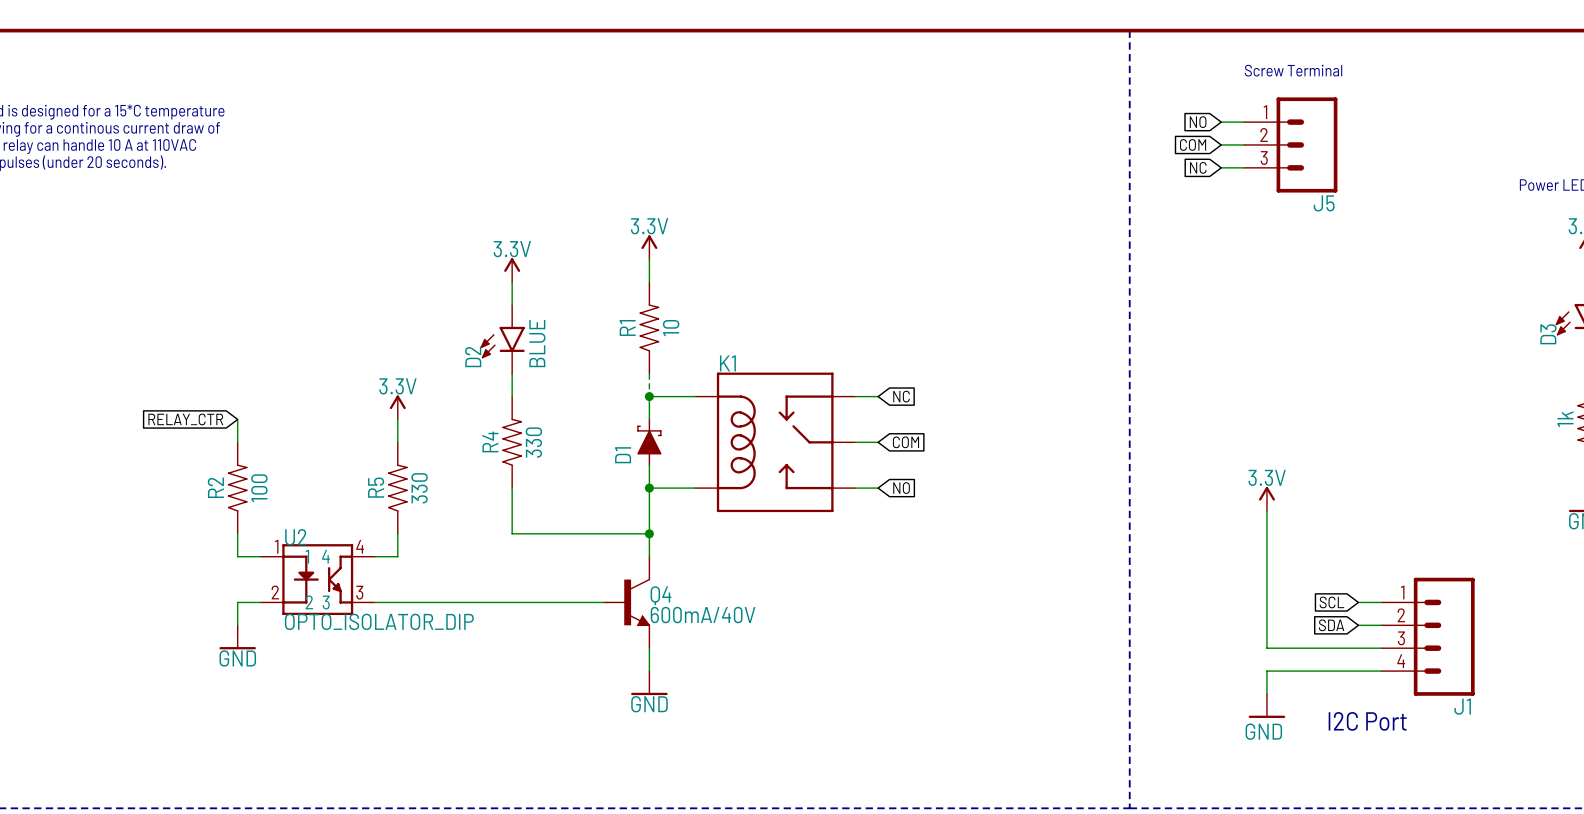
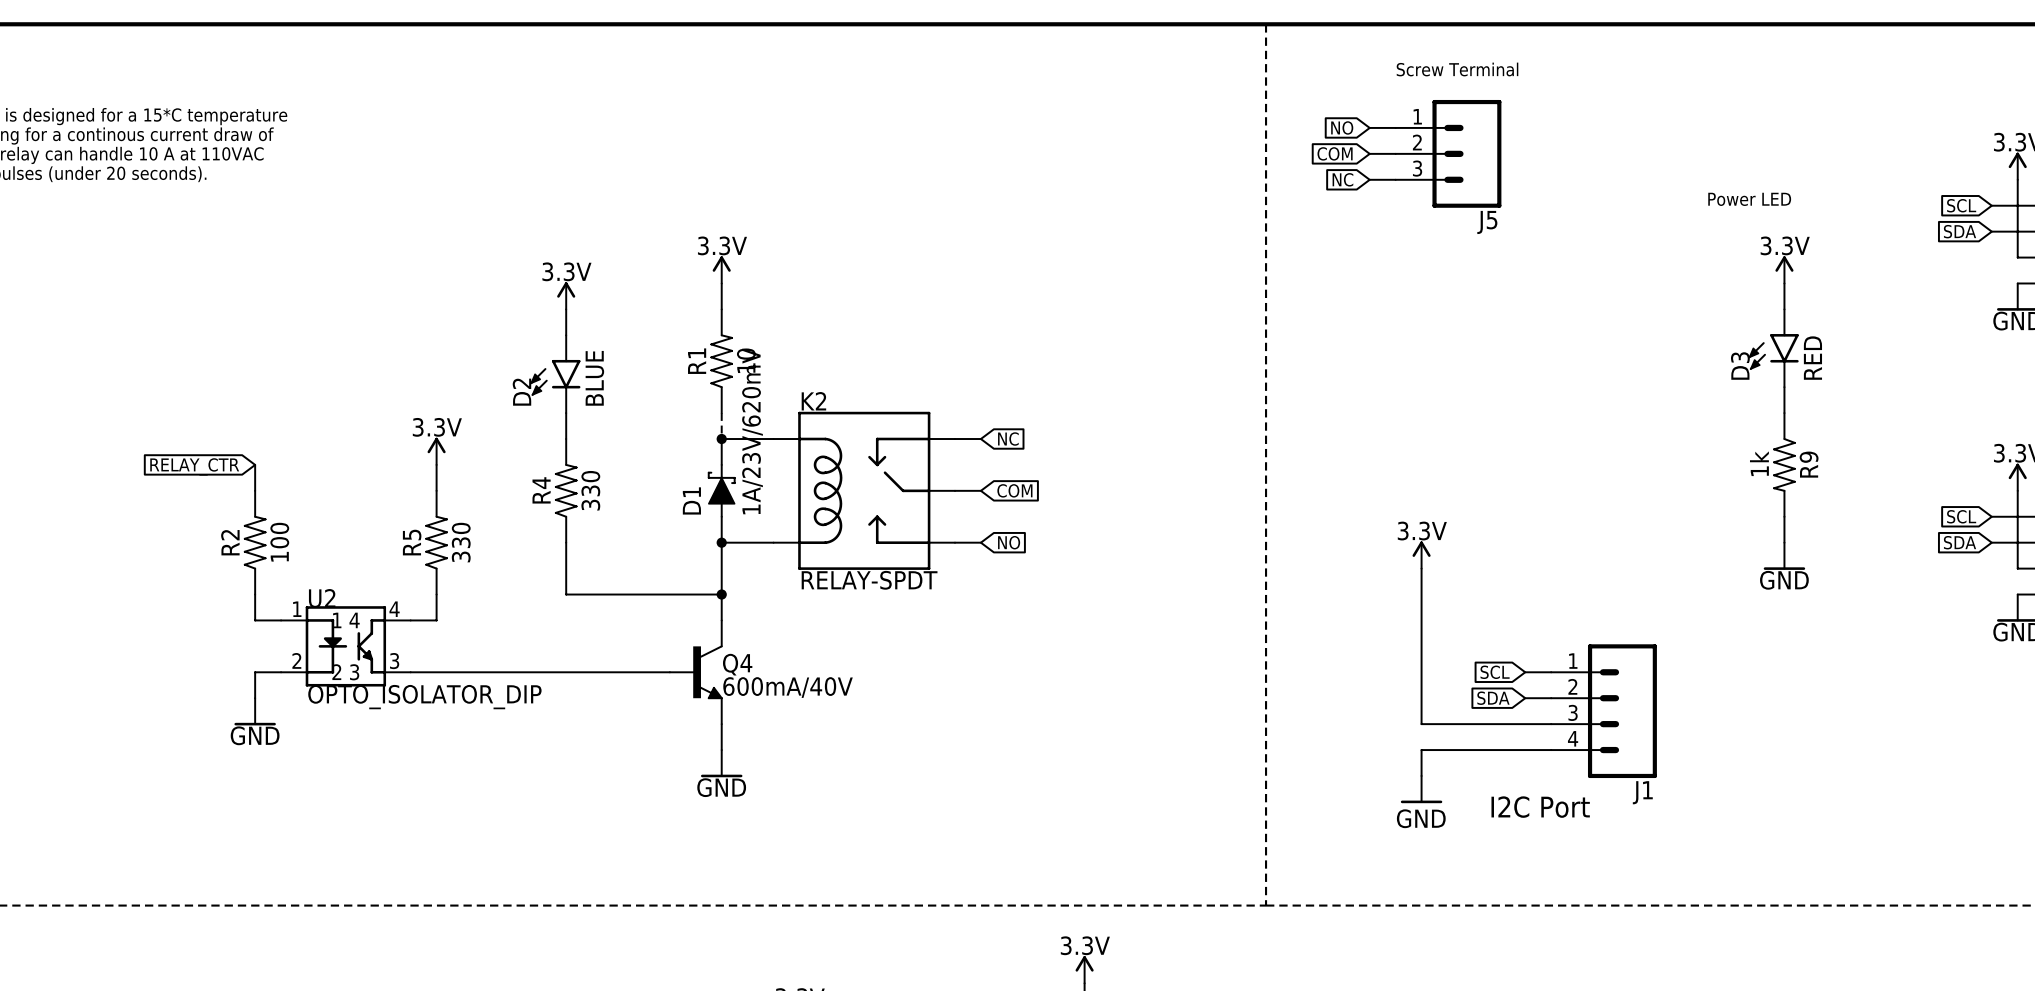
K1 name: K1 (727, 363) -> K2 (813, 401)
D1 value: none -> 1A/23V/620mV (752, 431)
K1 value: none -> RELAY-SPDT (869, 580)

